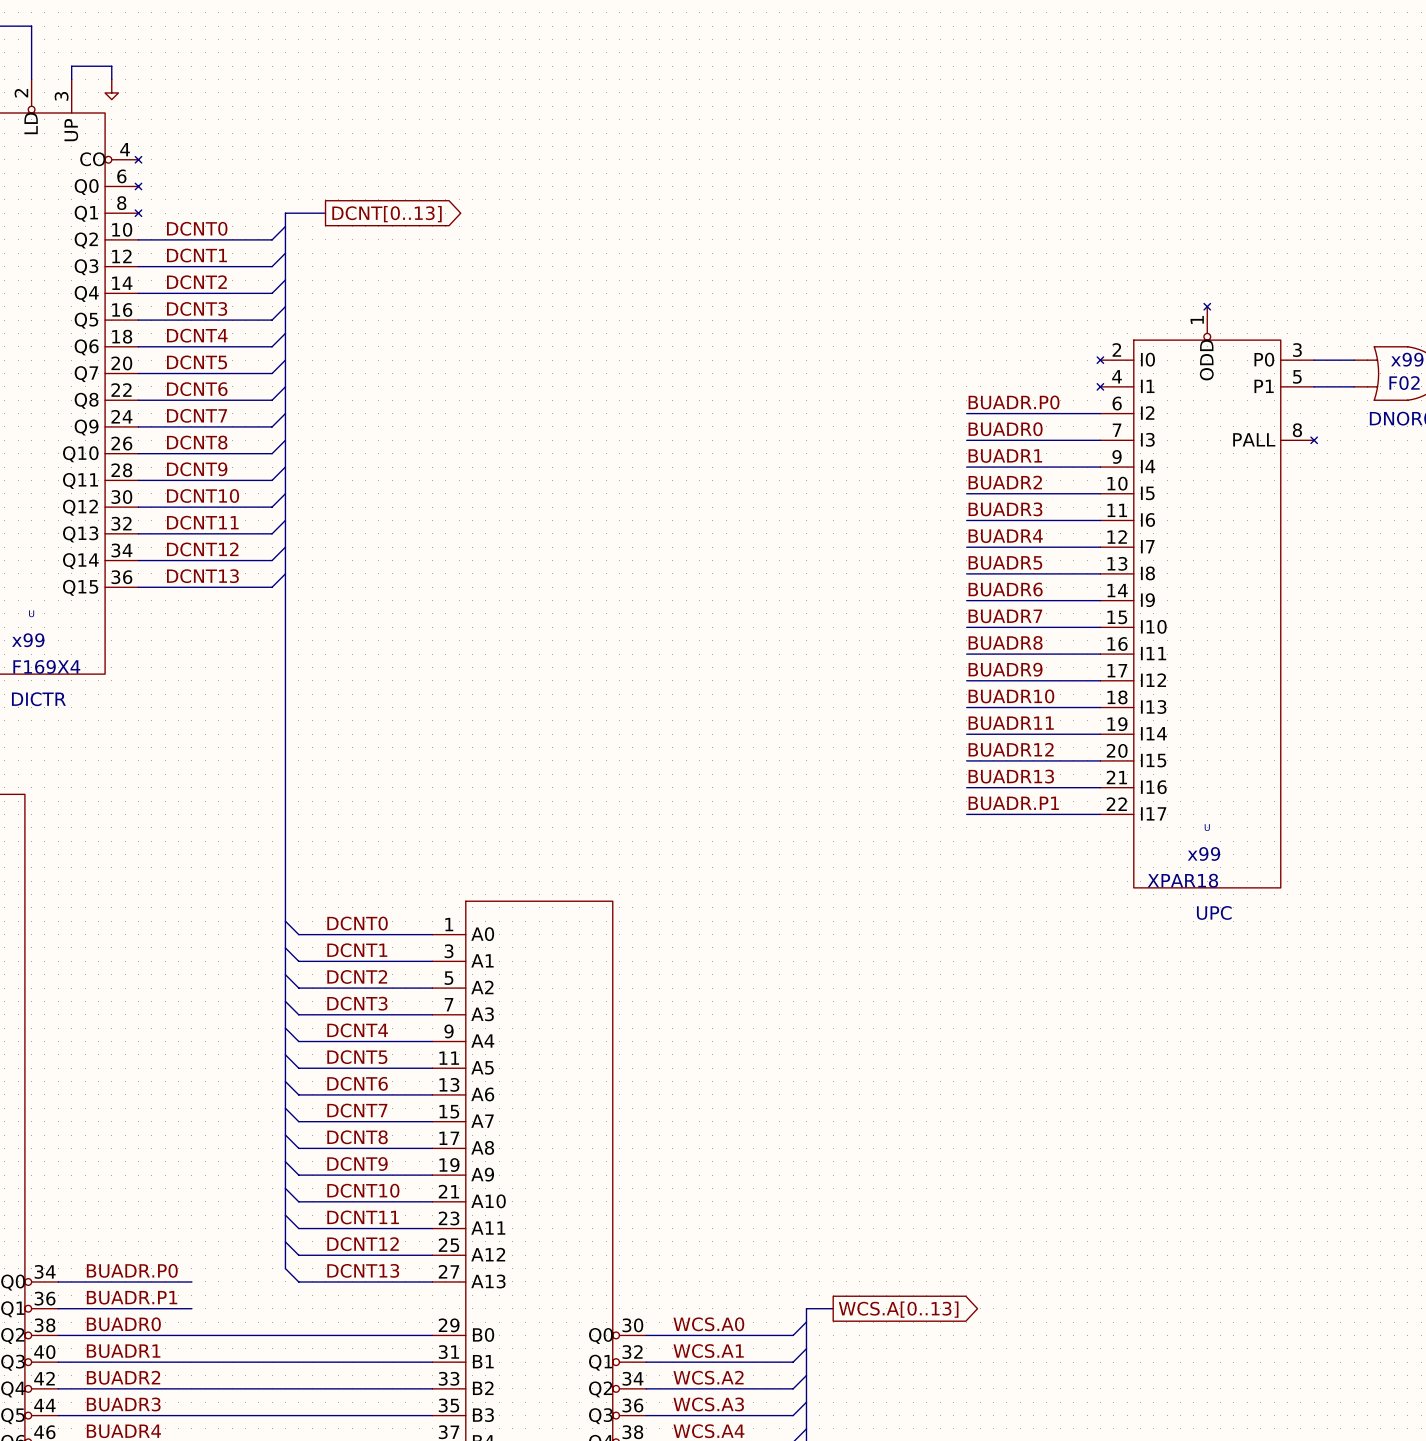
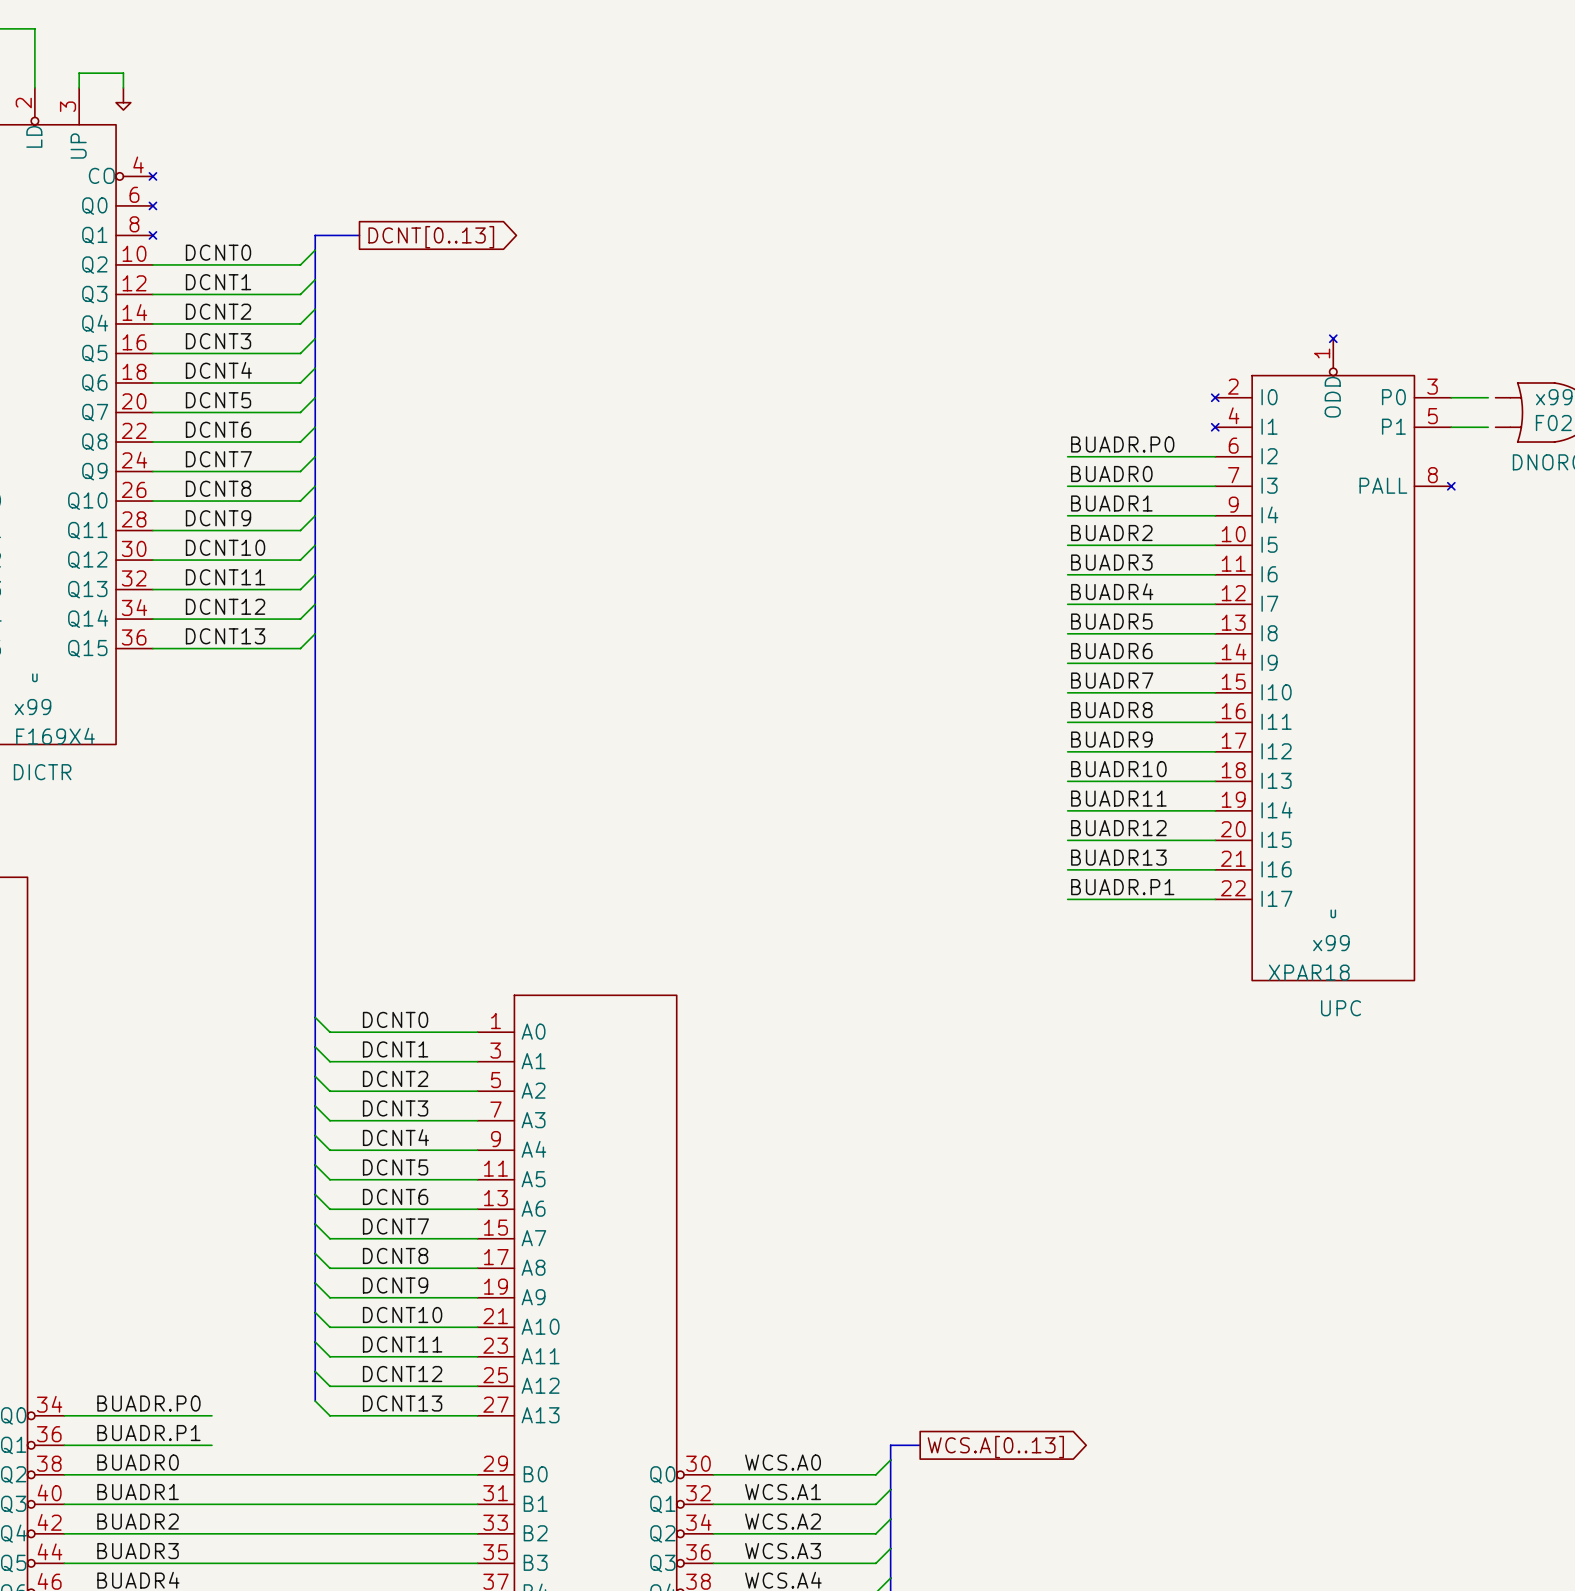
wire: (1347, 360) (1354, 360) -> none
wire: (1347, 386) (1354, 386) -> none

